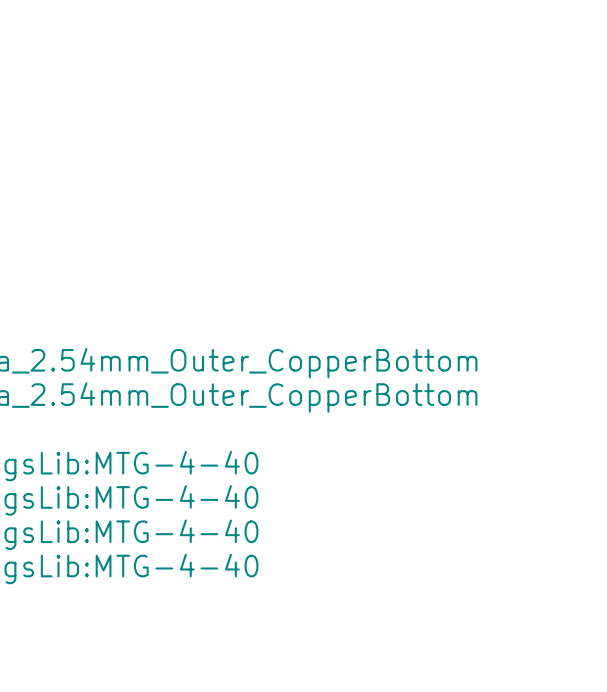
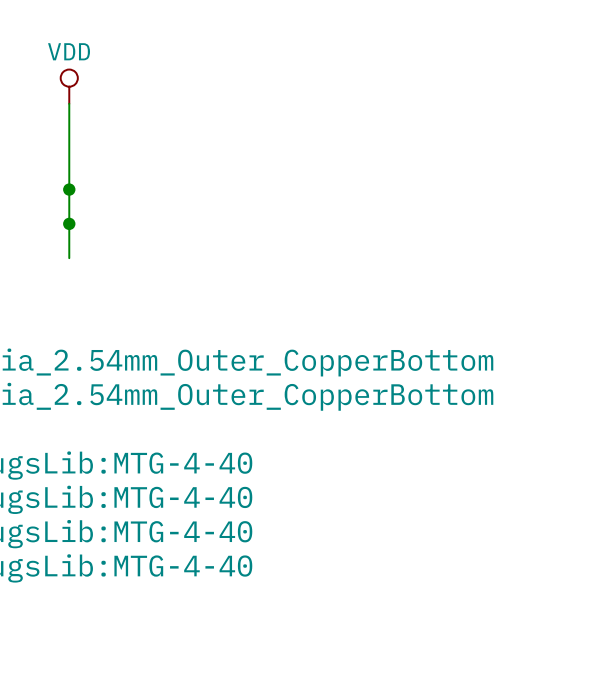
power symbol: none -> VDD (69, 86)
wire: none -> (69, 103) (69, 258)
junction: none -> (69, 189)
junction: none -> (69, 223)

